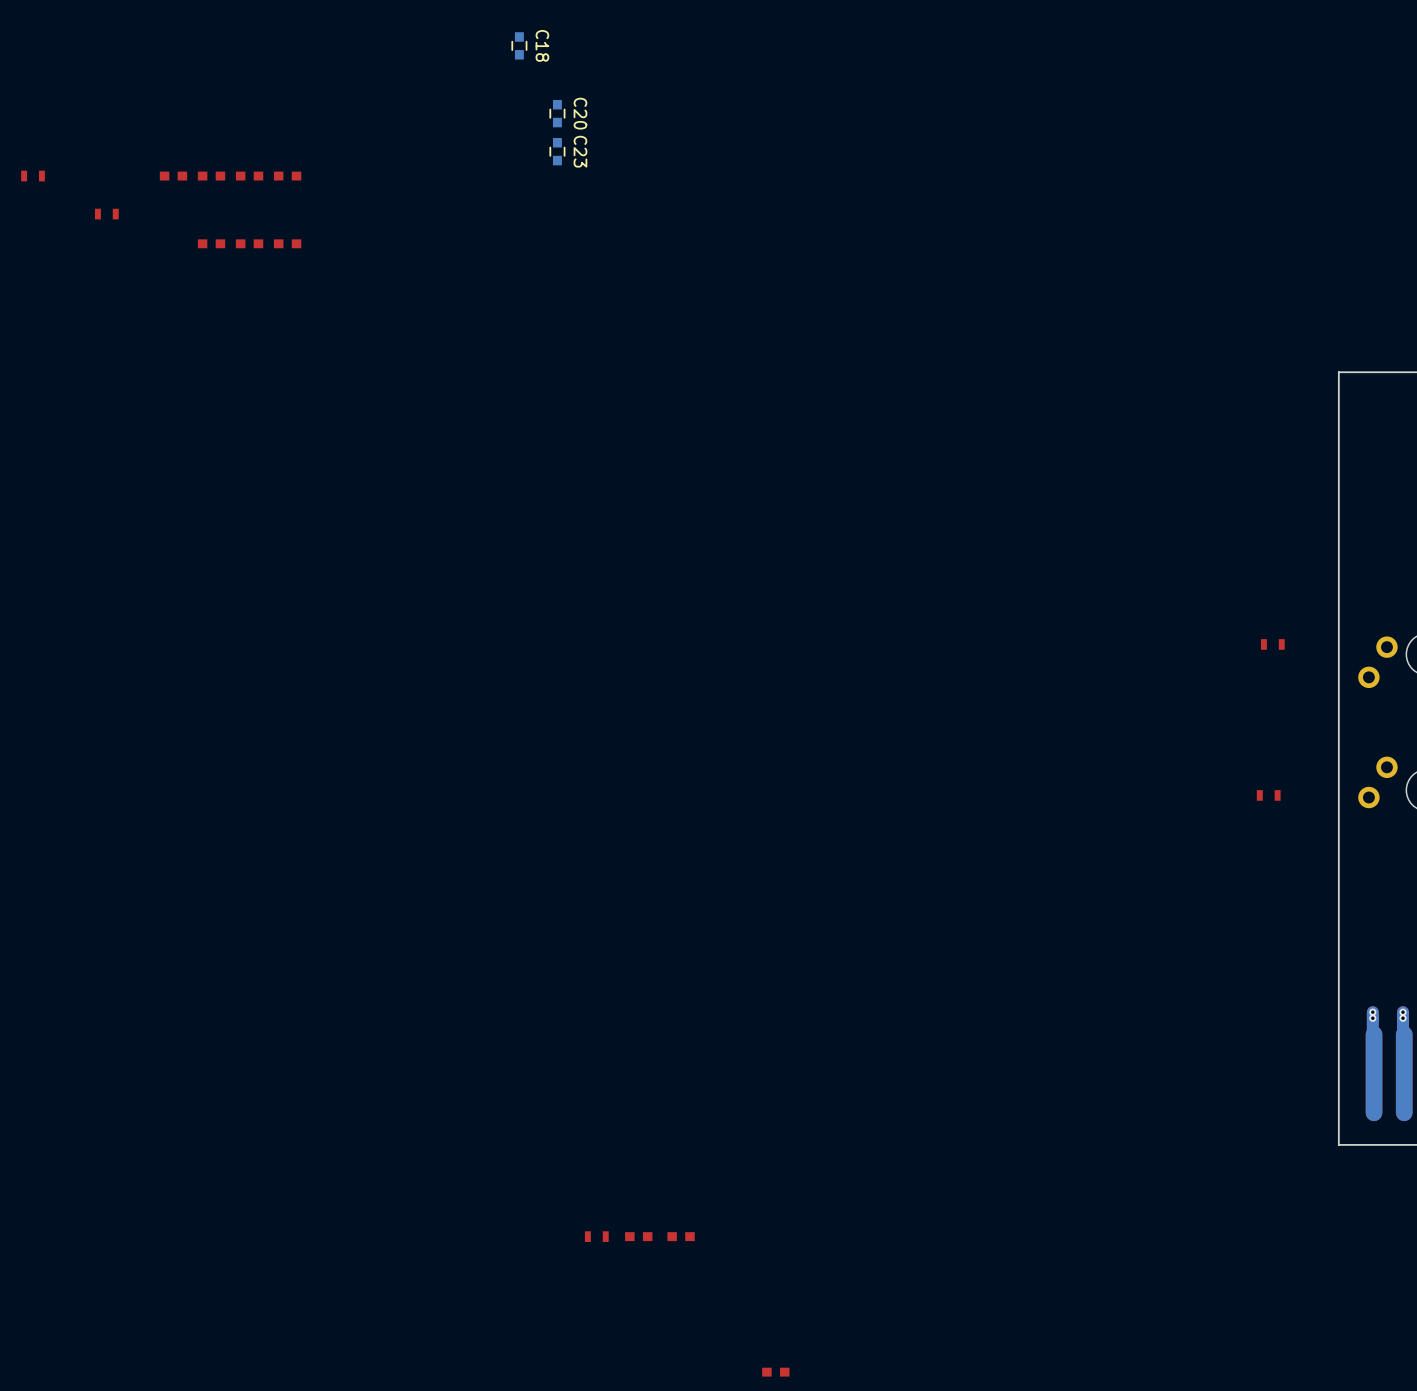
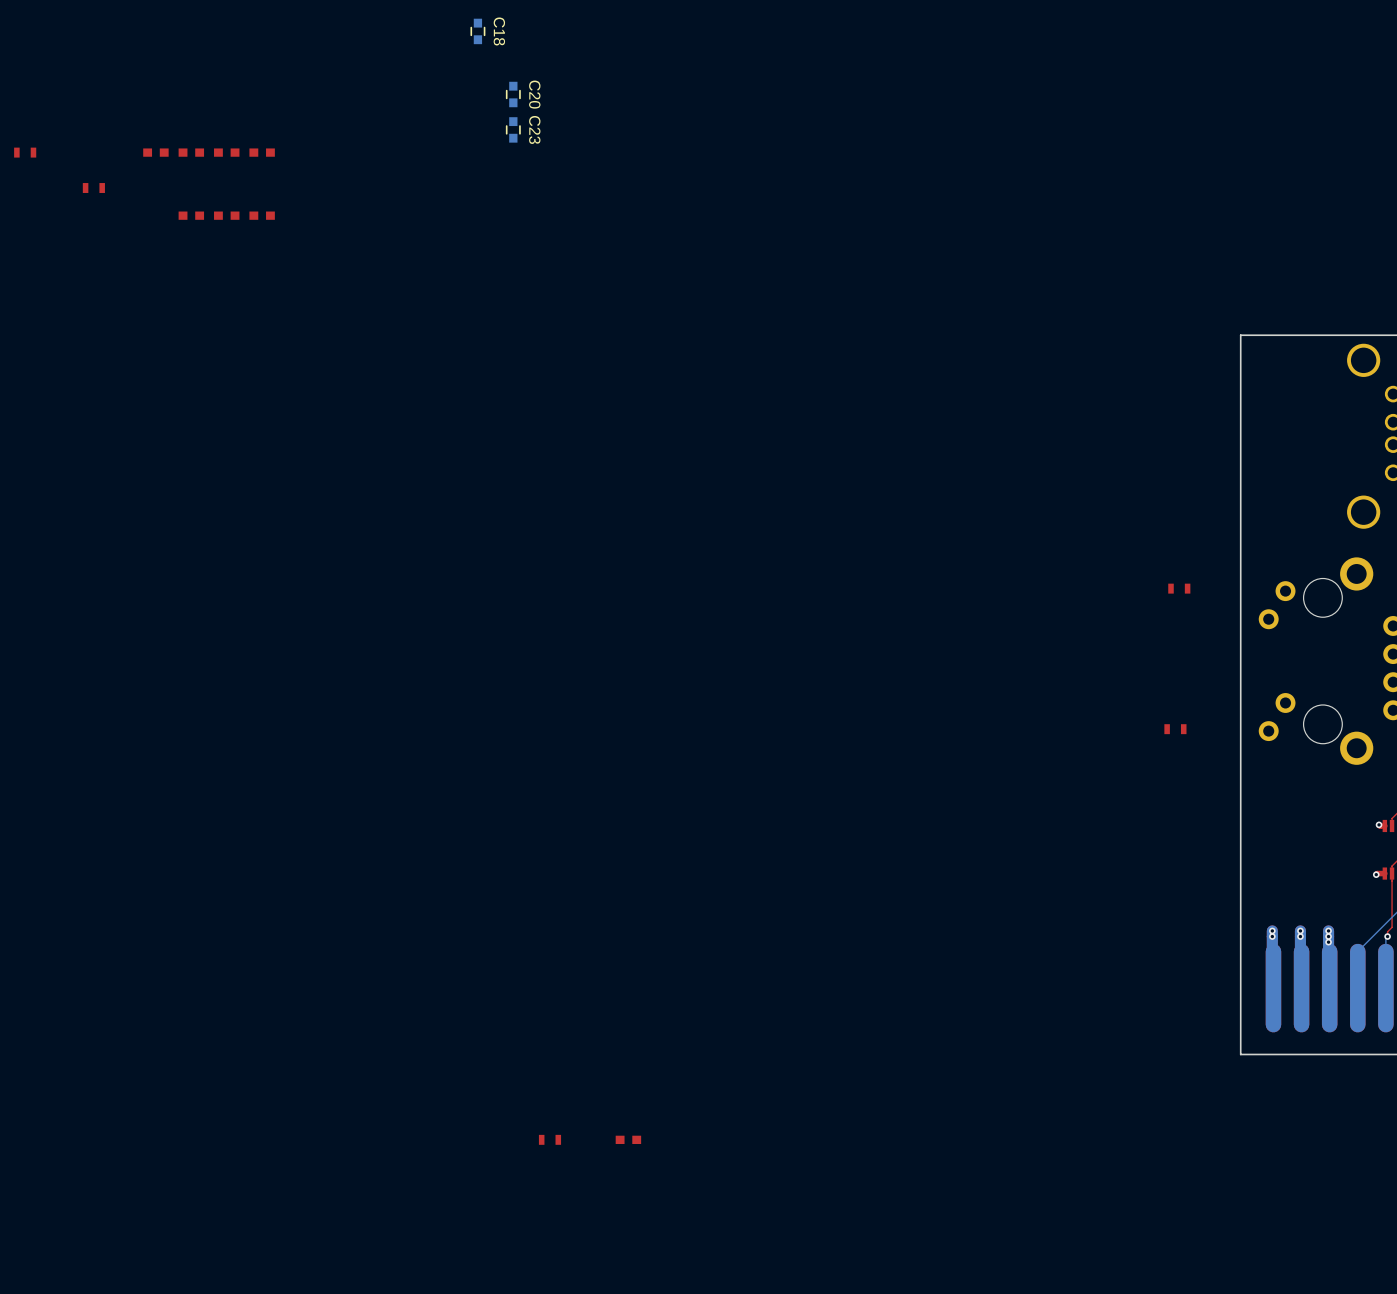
part: (638, 1236) -> none
part: (775, 1372) -> none

